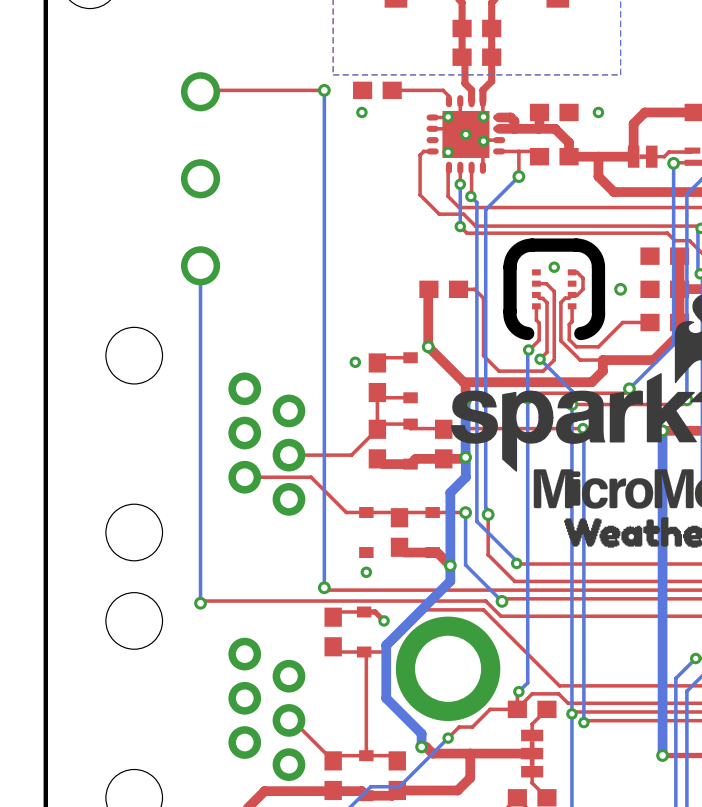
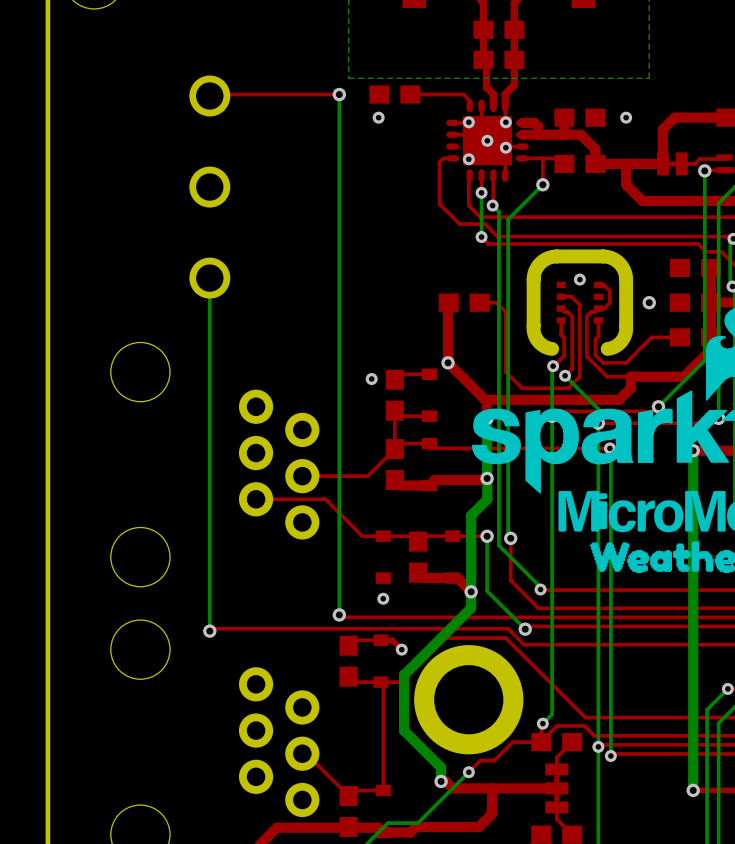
part: (443, 444) -> none
top track: (366, 755) (392, 755) (397, 760) -> none
part: (397, 775) -> none

